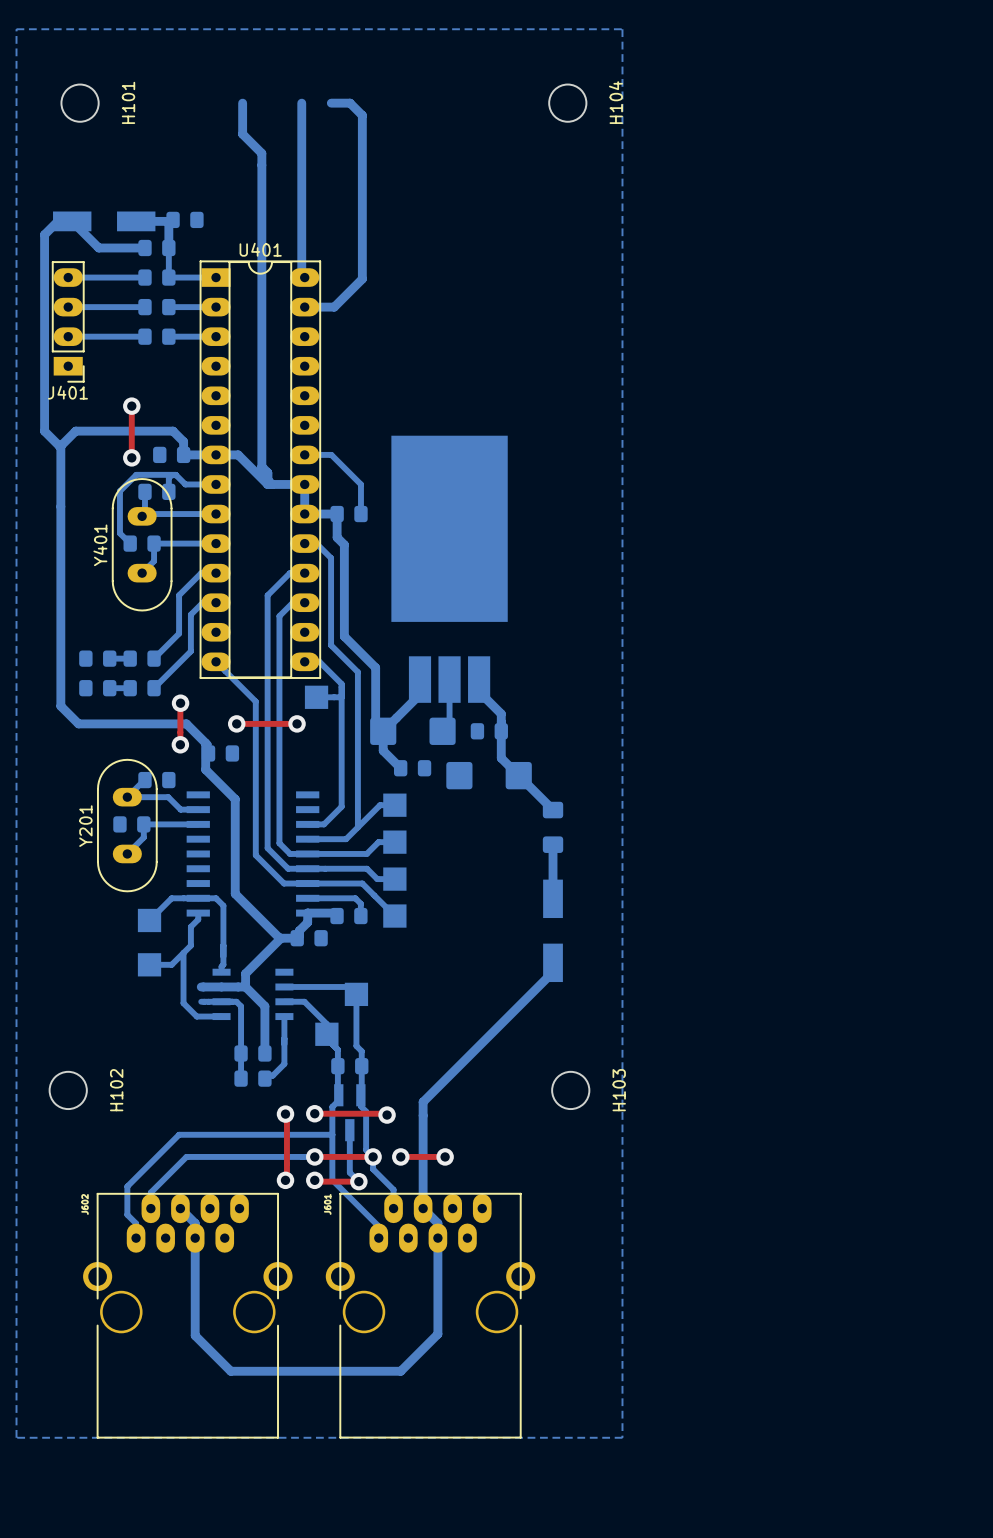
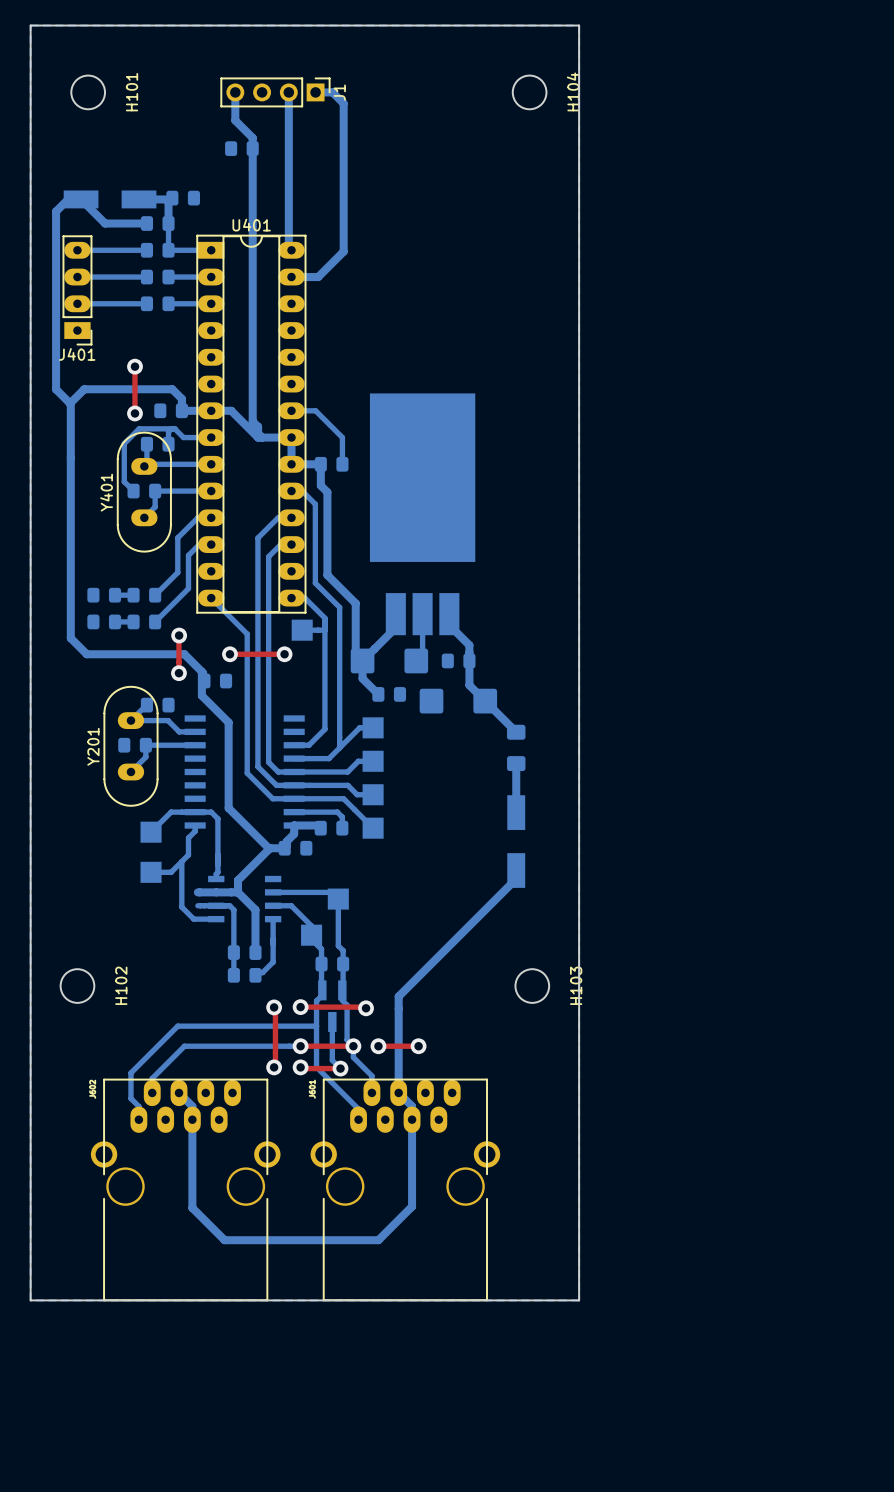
board edge: none -> (30, 25) (579, 25) (579, 1300) (30, 1300) (30, 25)
J1: none -> (275, 92)
part: none -> (241, 148)

